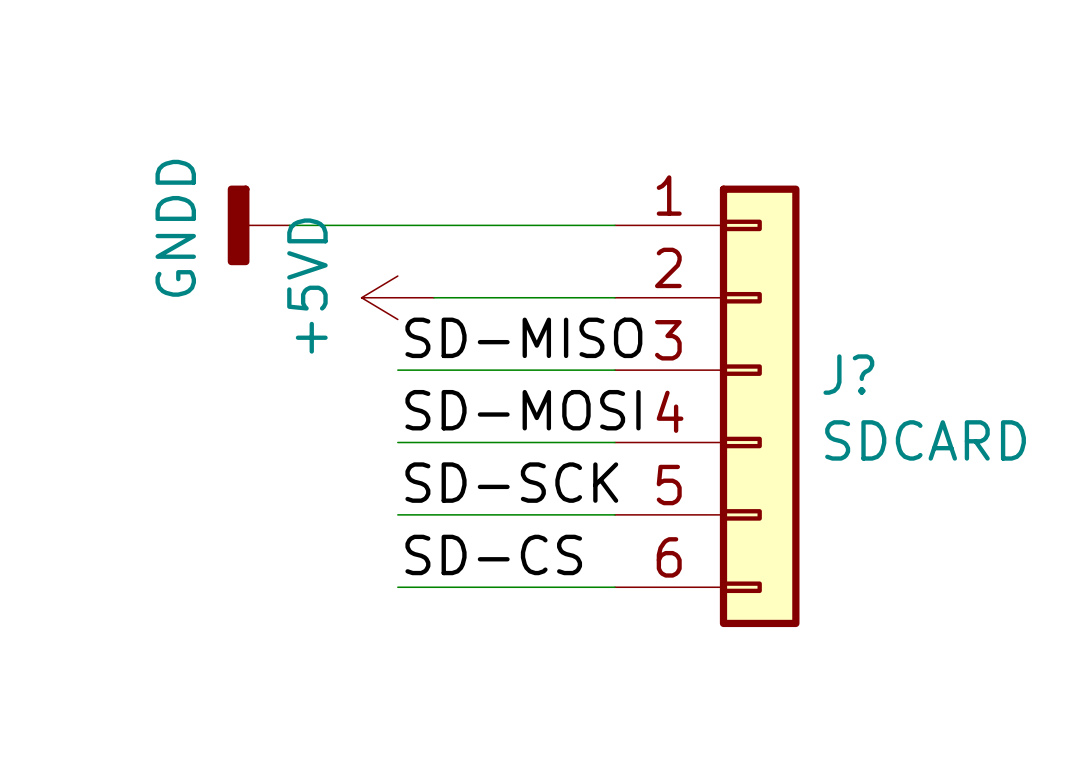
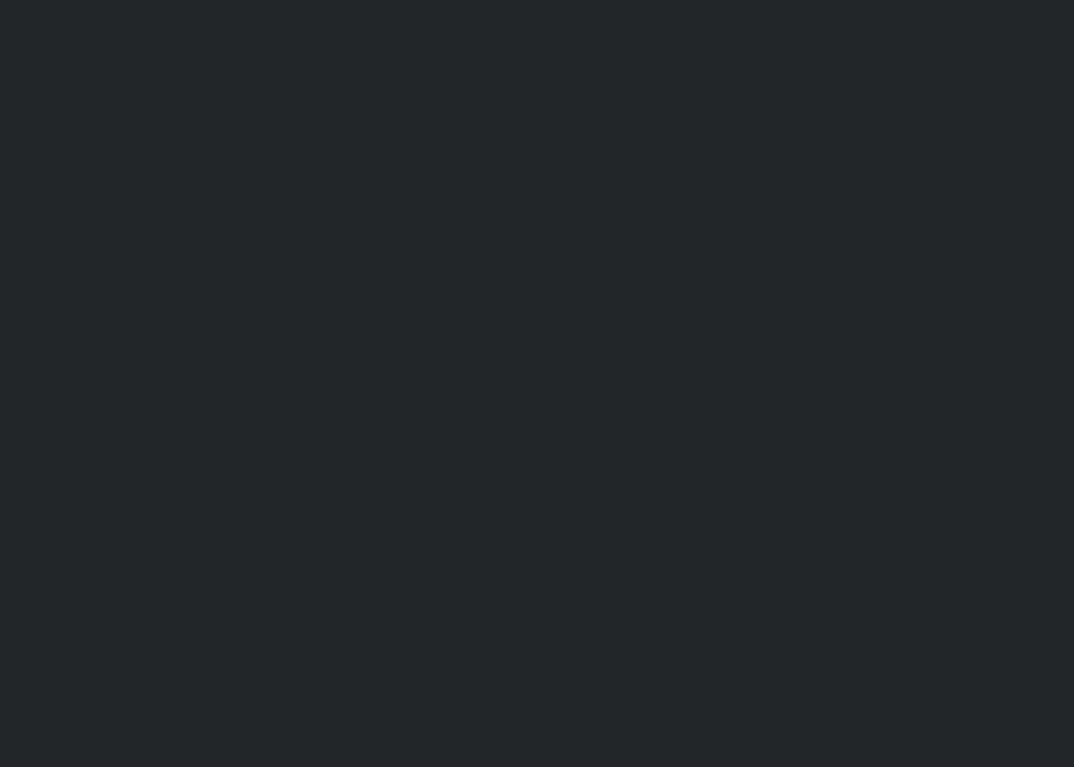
power symbol: GNDD (258, 225) -> none
wire: (289, 225) (614, 225) -> none
power symbol: +5VD (397, 297) -> none
wire: (434, 297) (614, 297) -> none
label: SD-MISO (523, 337) -> none
wire: (397, 370) (614, 370) -> none
J?: SDCARD (707, 406) -> none
label: SD-MOSI (523, 410) -> none
wire: (397, 442) (614, 442) -> none
label: SD-SCK (511, 482) -> none
wire: (397, 514) (614, 514) -> none
label: SD-CS (493, 554) -> none
wire: (397, 587) (614, 587) -> none

